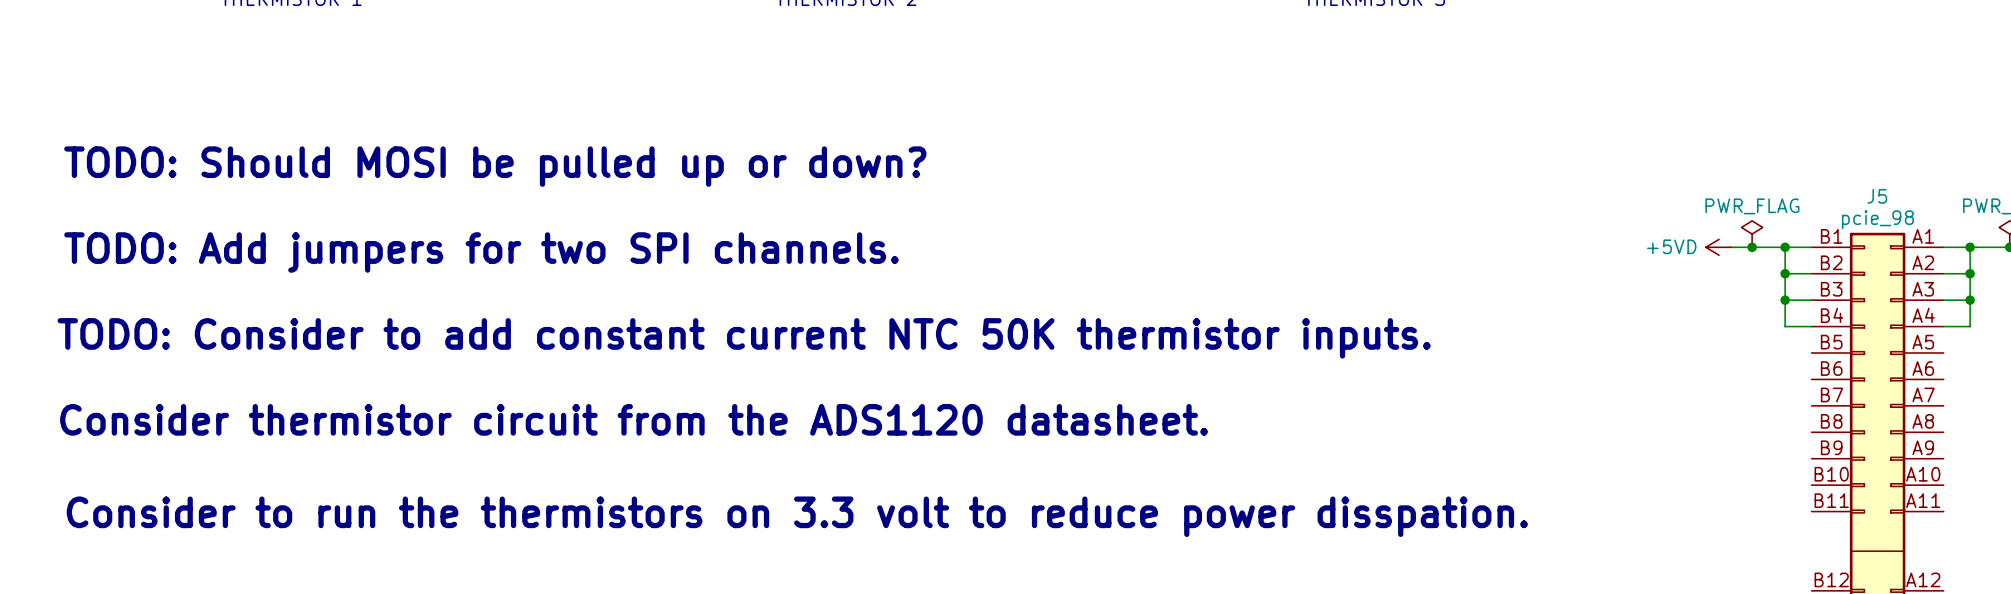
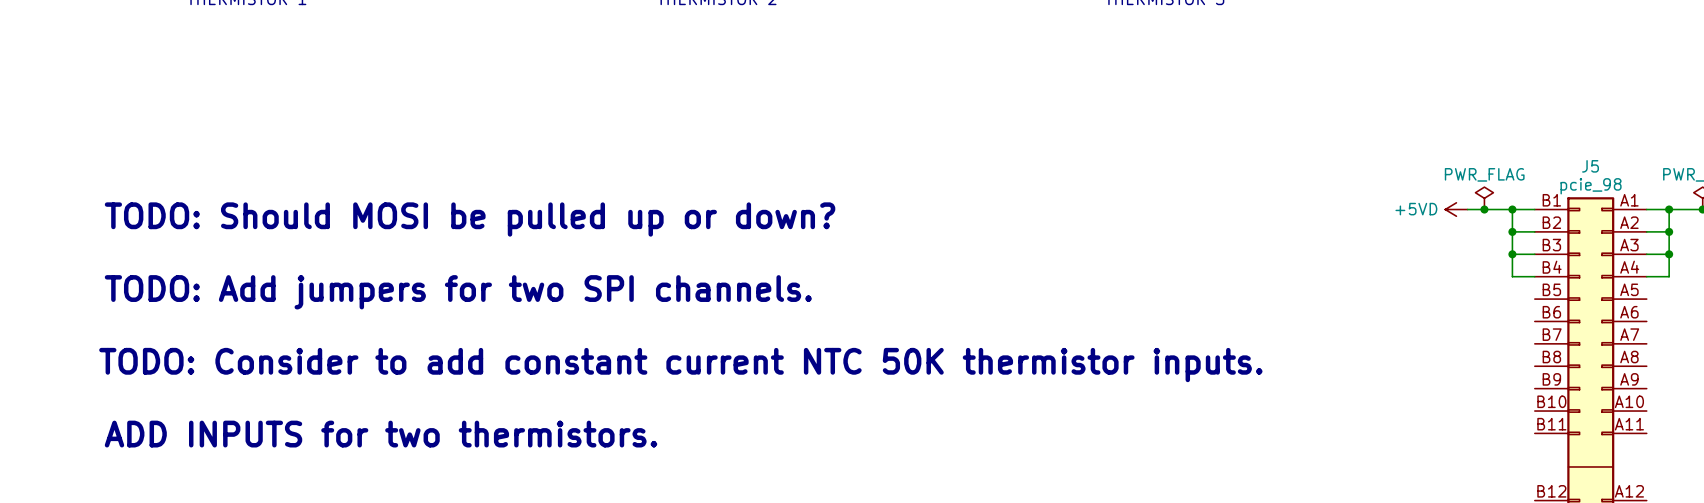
text position: TODO: Should MOSI be pulled up or down? (495, 166) -> TODO: Should MOSI be pulled up or down? (470, 219)
text position: TODO: Add jumpers for two SPI channels. (481, 252) -> TODO: Add jumpers for two SPI channels. (458, 292)
text position: TODO: Consider to add constant current NTC 50K thermistor inputs. (744, 338) -> TODO: Consider to add constant current NTC 50K thermistor inputs. (680, 365)
text: Consider thermistor circuit from the ADS1120 datasheet. (634, 419) -> none
text: none -> ADD INPUTS for two thermistors. (381, 434)
text: Consider to run the thermistors on 3.3 volt to reduce power disspation. (797, 516) -> none

